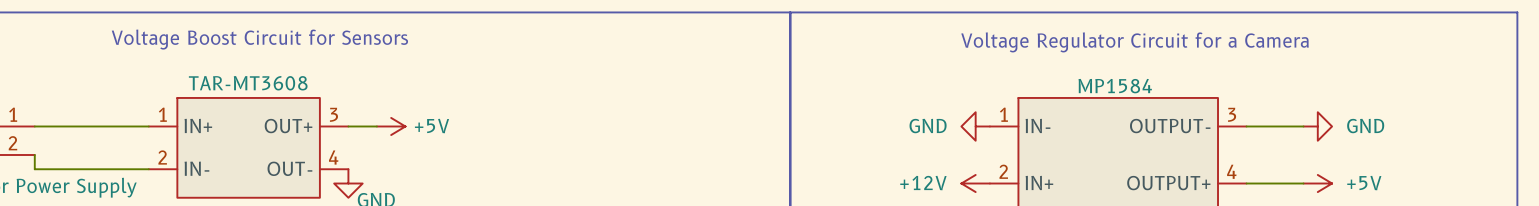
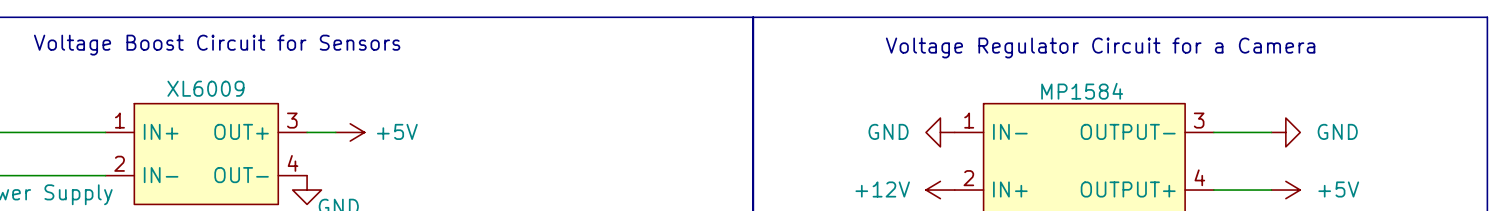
part value: TAR-MT3608 (248, 83) -> XL6009 (205, 88)

